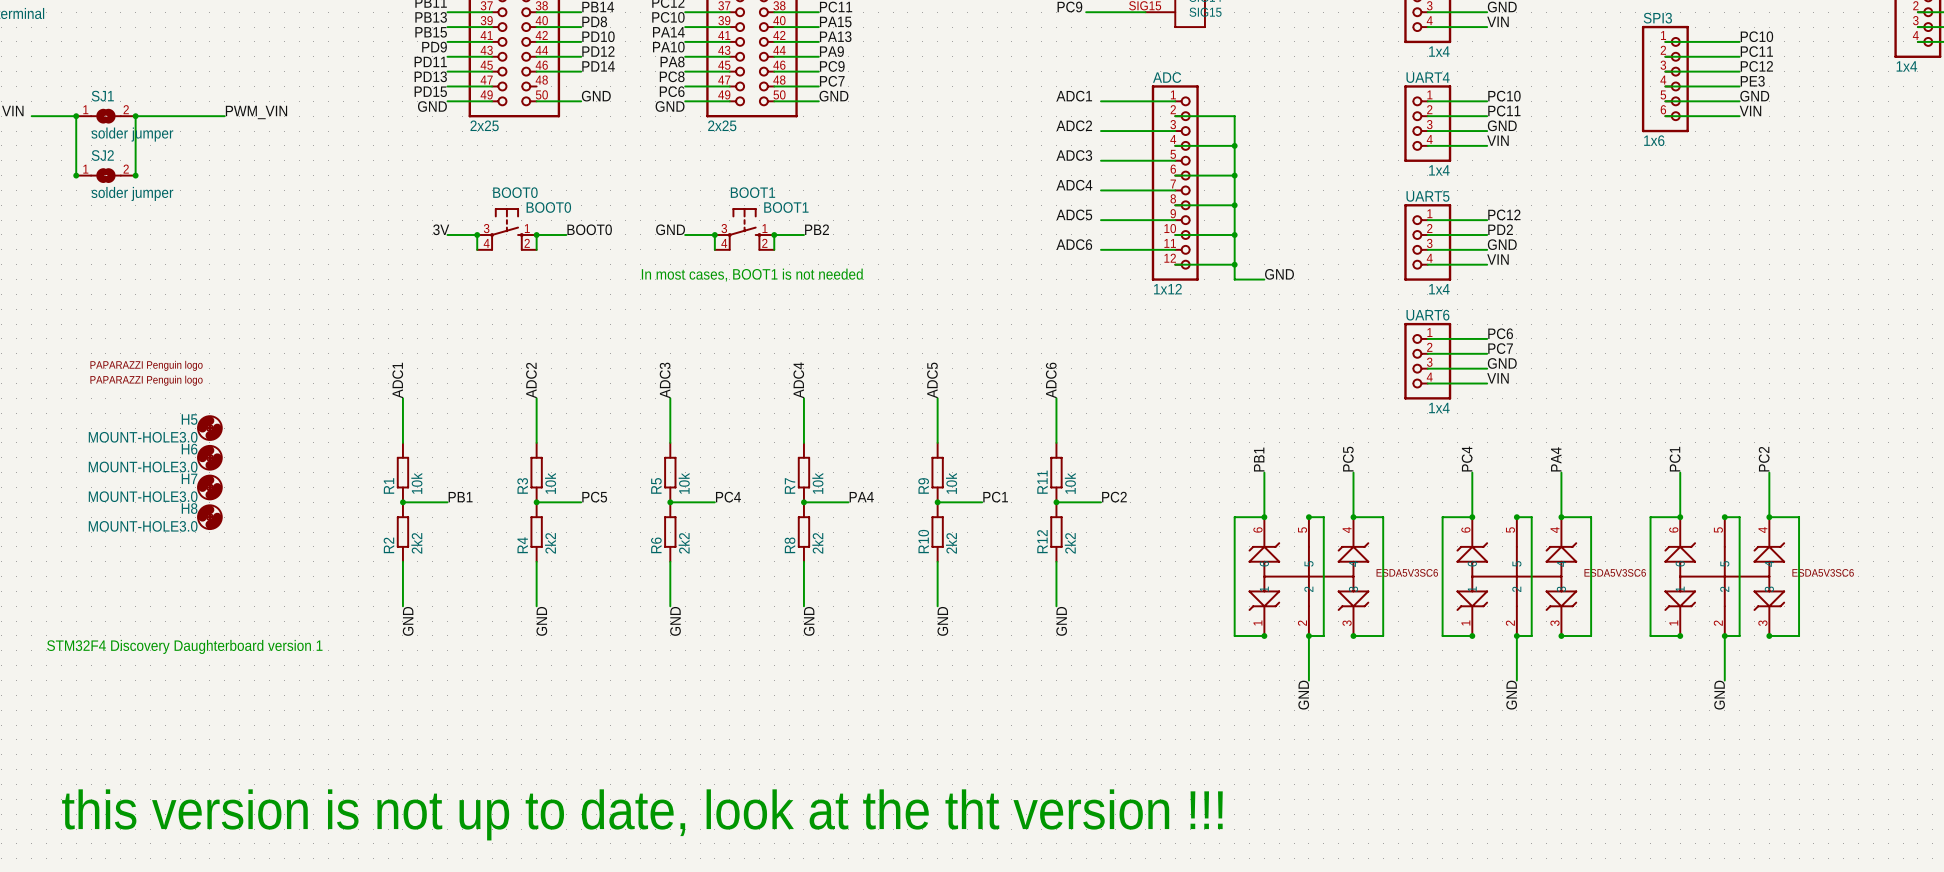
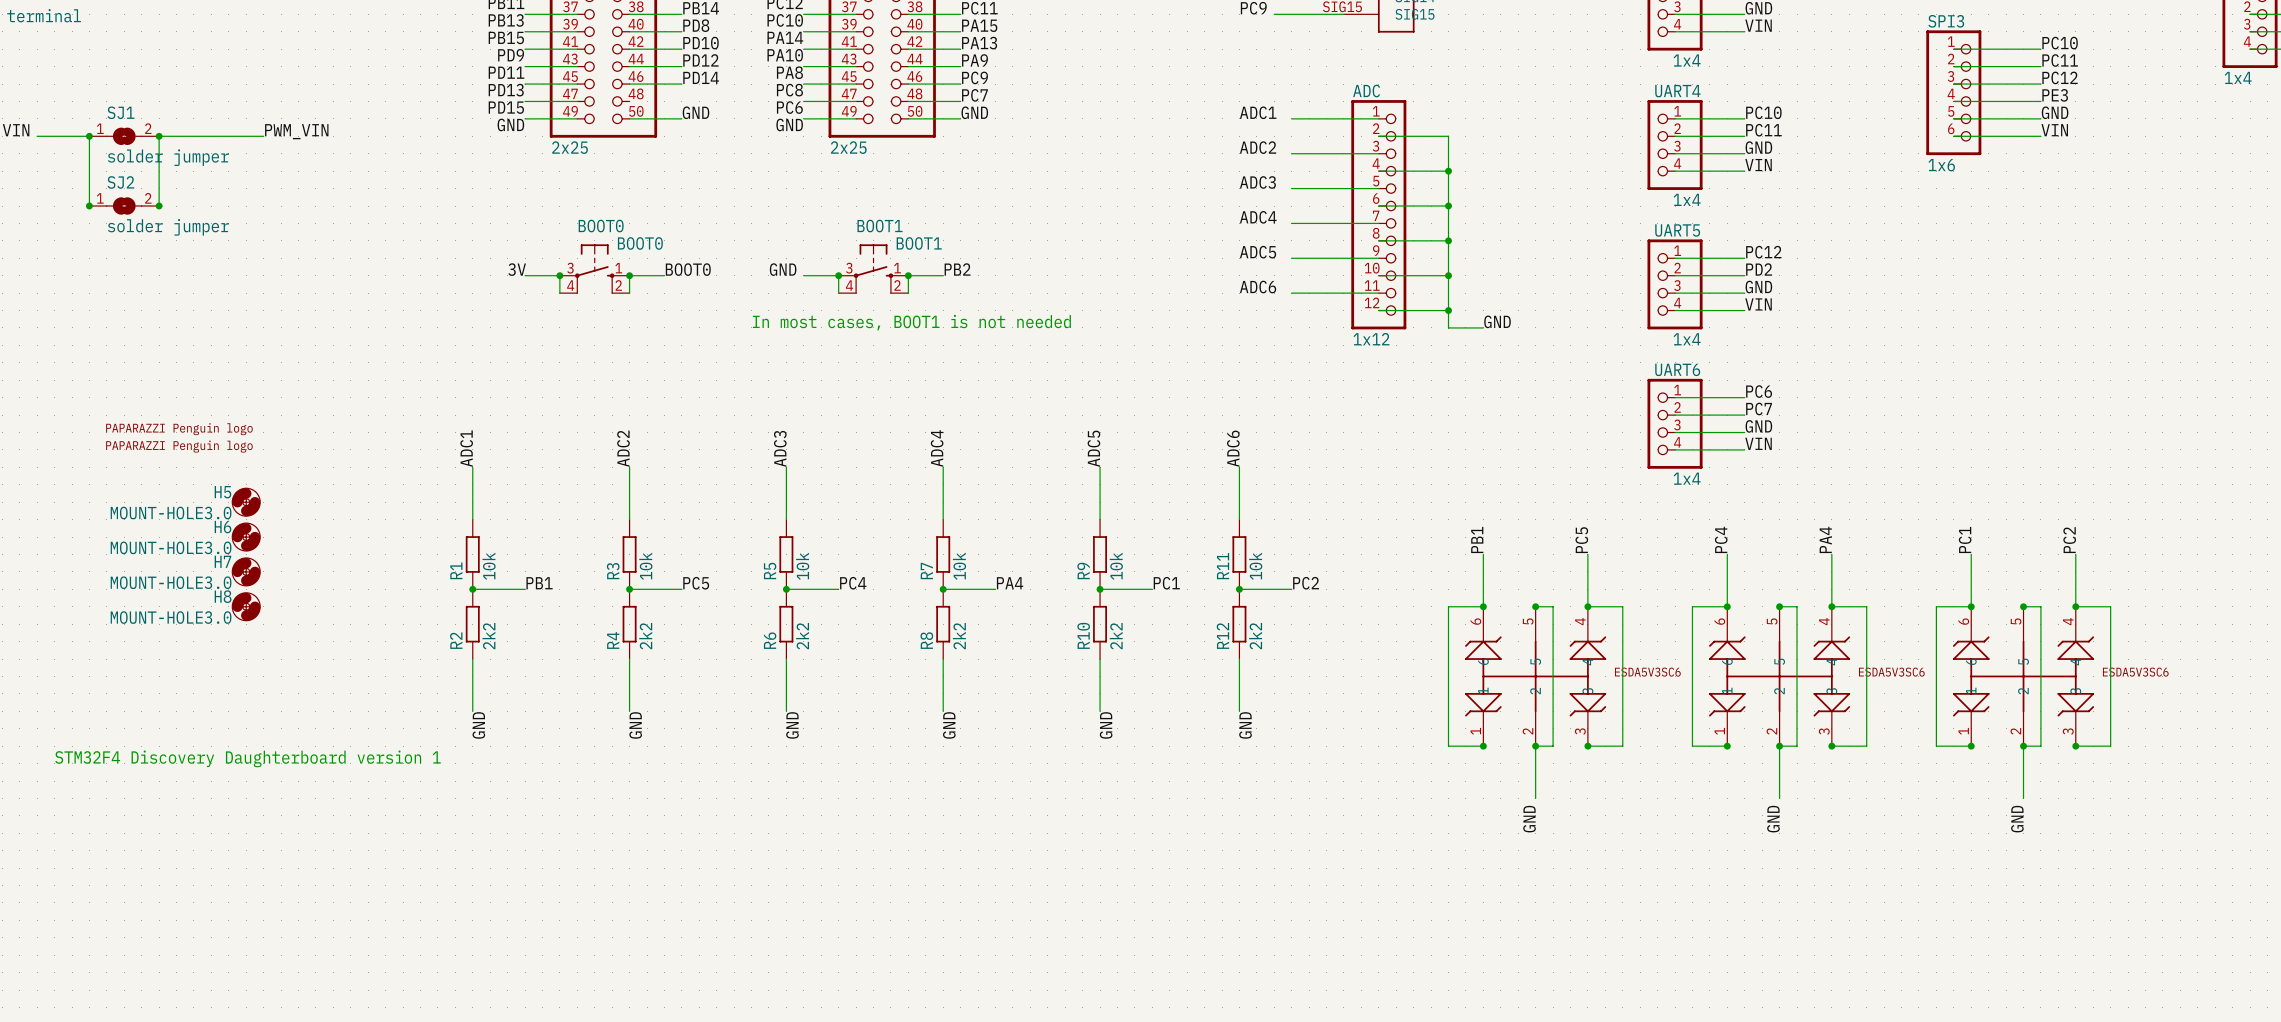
text: this version is not up to date, look at the tht version !!! (642, 814) -> none

